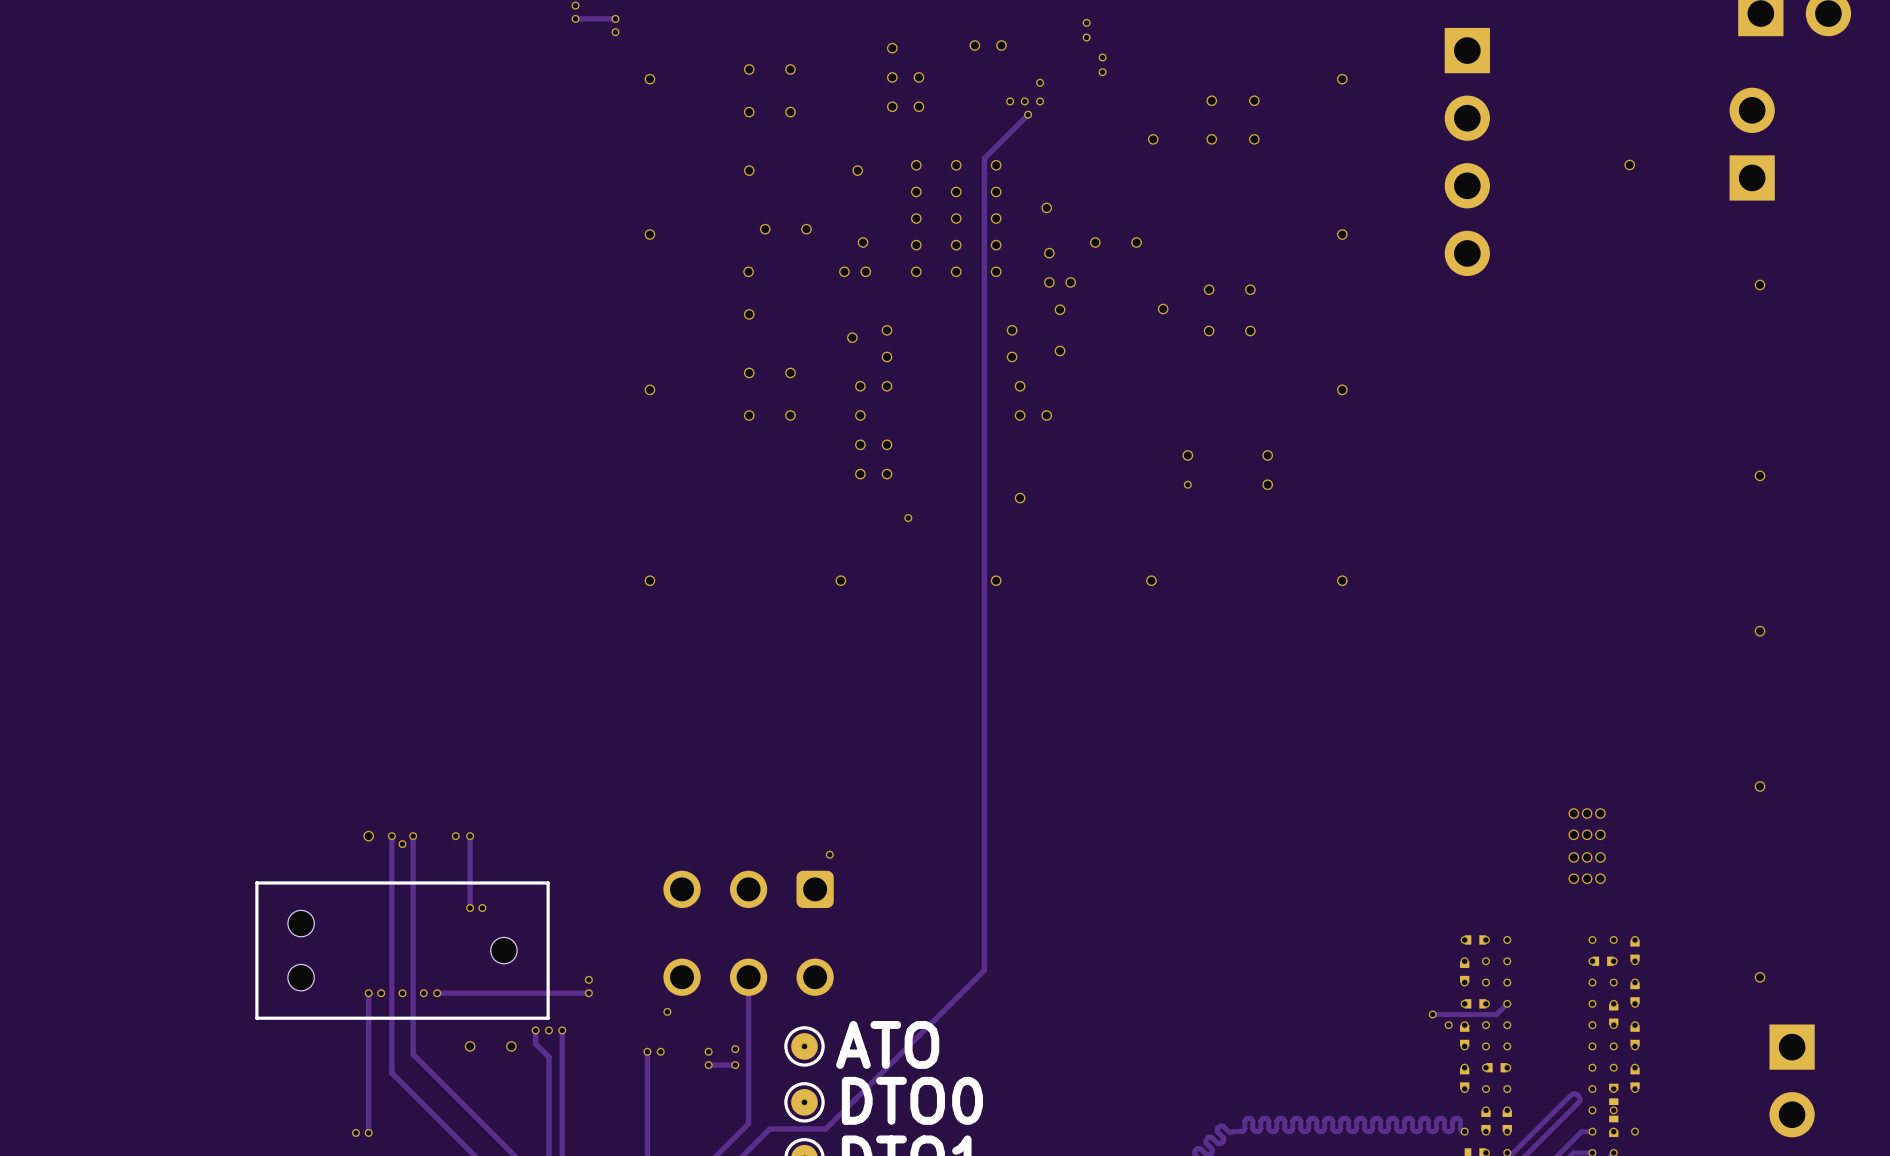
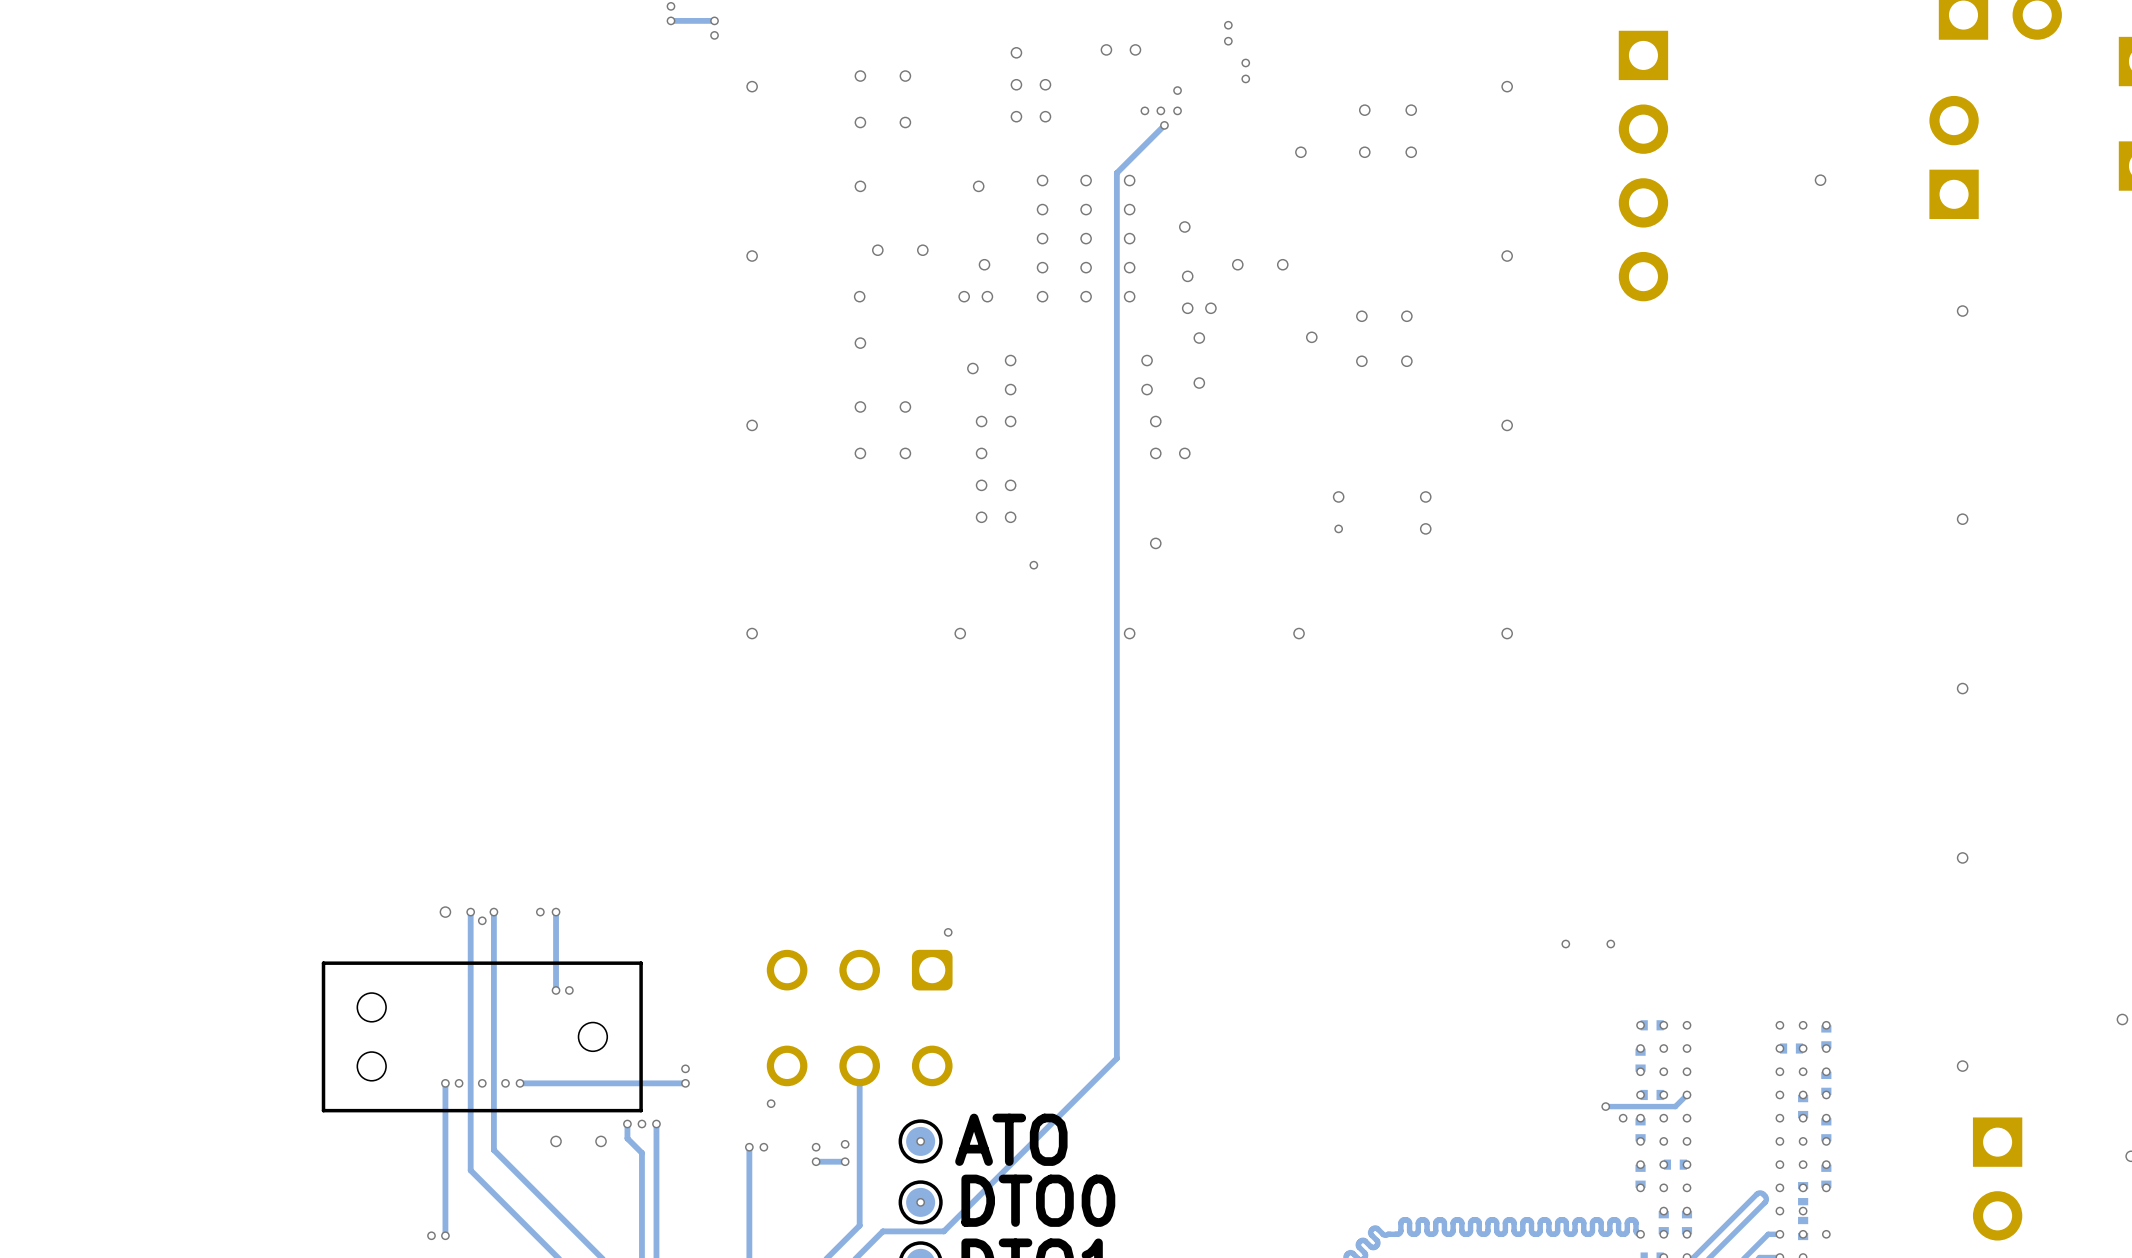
via: (1573, 813) -> none
via: (1587, 813) -> none
via: (1600, 813) -> none
via: (1573, 834) -> none
via: (1587, 834) -> none
via: (1600, 834) -> none
via: (1573, 857) -> none
via: (1587, 857) -> none
via: (1600, 857) -> none
via: none -> (1565, 944)
via: none -> (1610, 944)
via: (1573, 878) -> none
via: (1587, 878) -> none
via: (1600, 878) -> none

